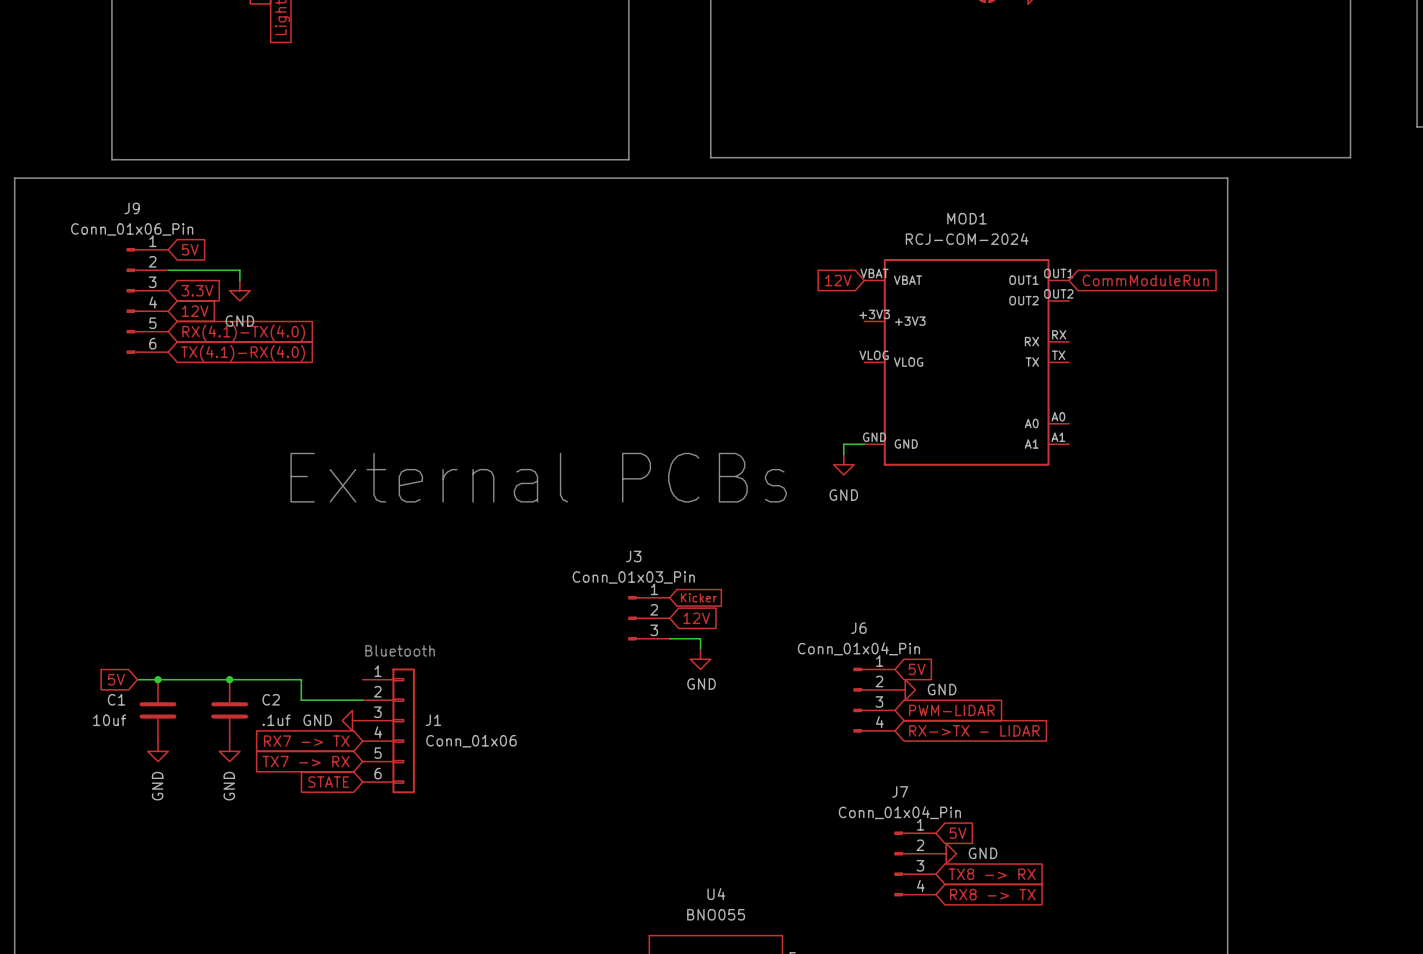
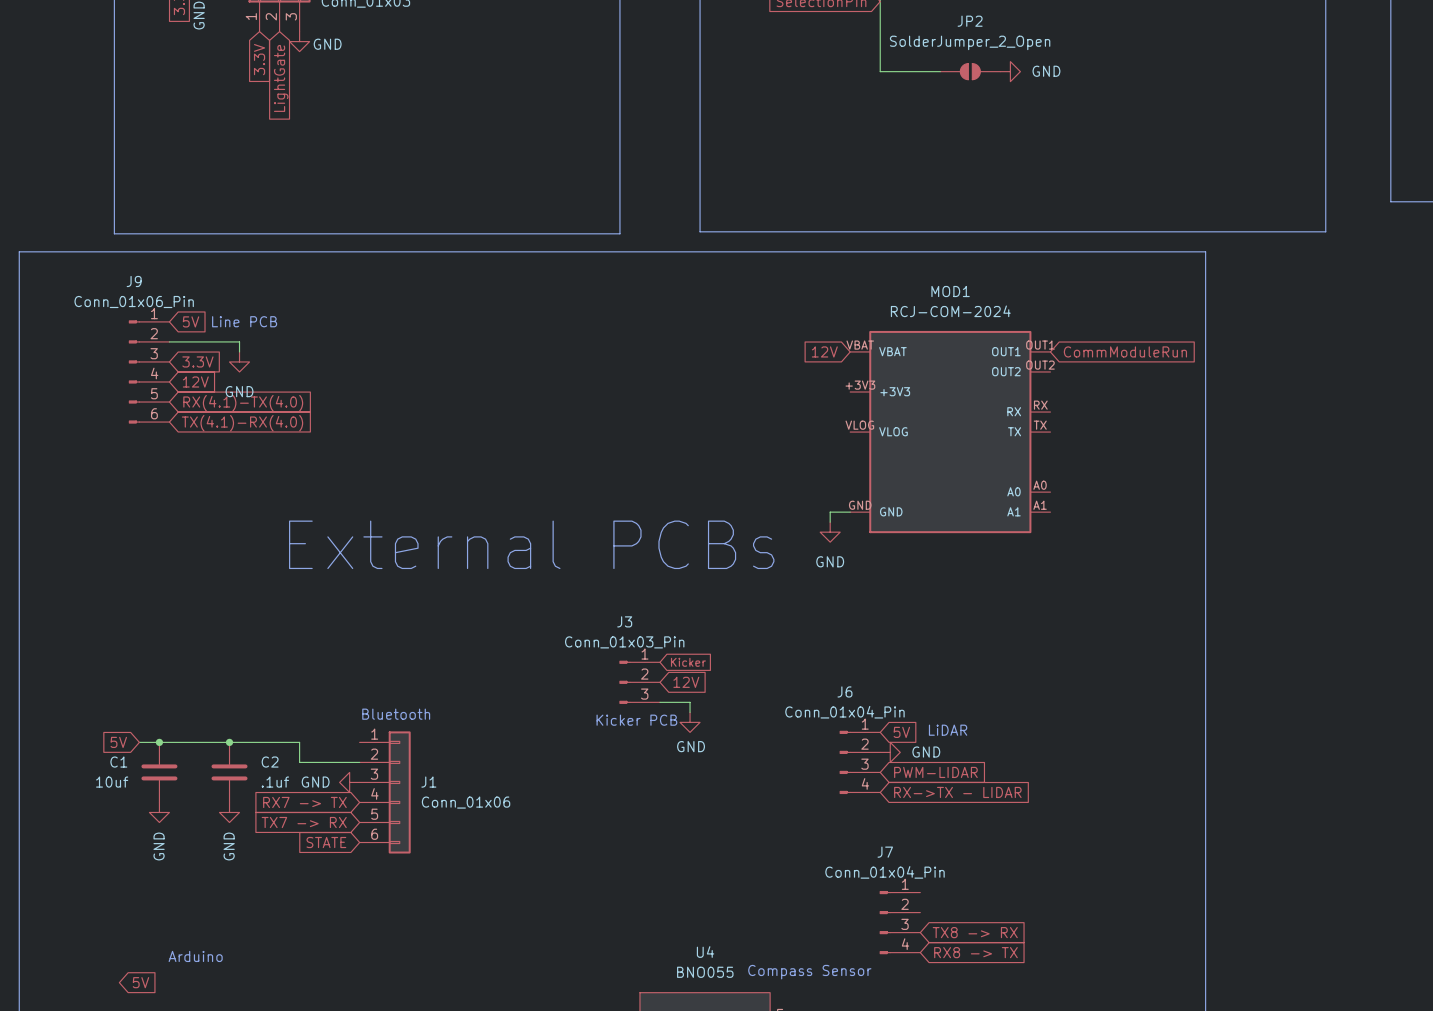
text: none -> Line PCB (244, 321)
text: none -> Kicker PCB (636, 720)
text: none -> LiDAR (948, 730)
global label: 5V (958, 833) -> none
power symbol: GND (946, 853) -> none
text: none -> Arduino (195, 956)
text: none -> Compass Sensor (809, 972)
global label: none -> 5V (140, 982)

